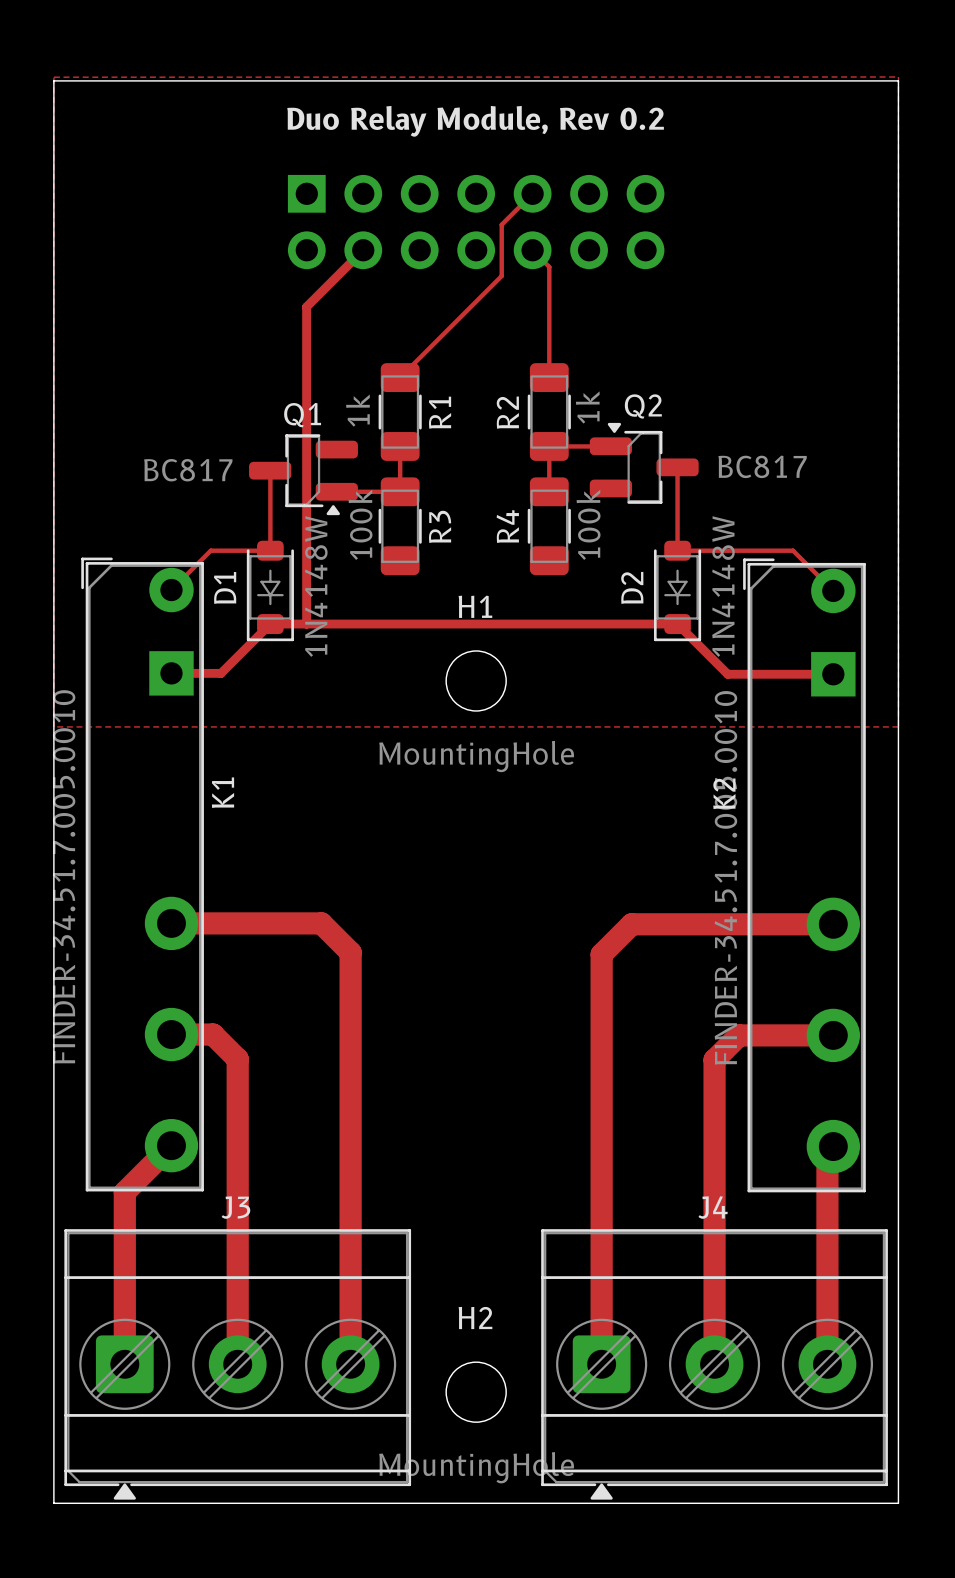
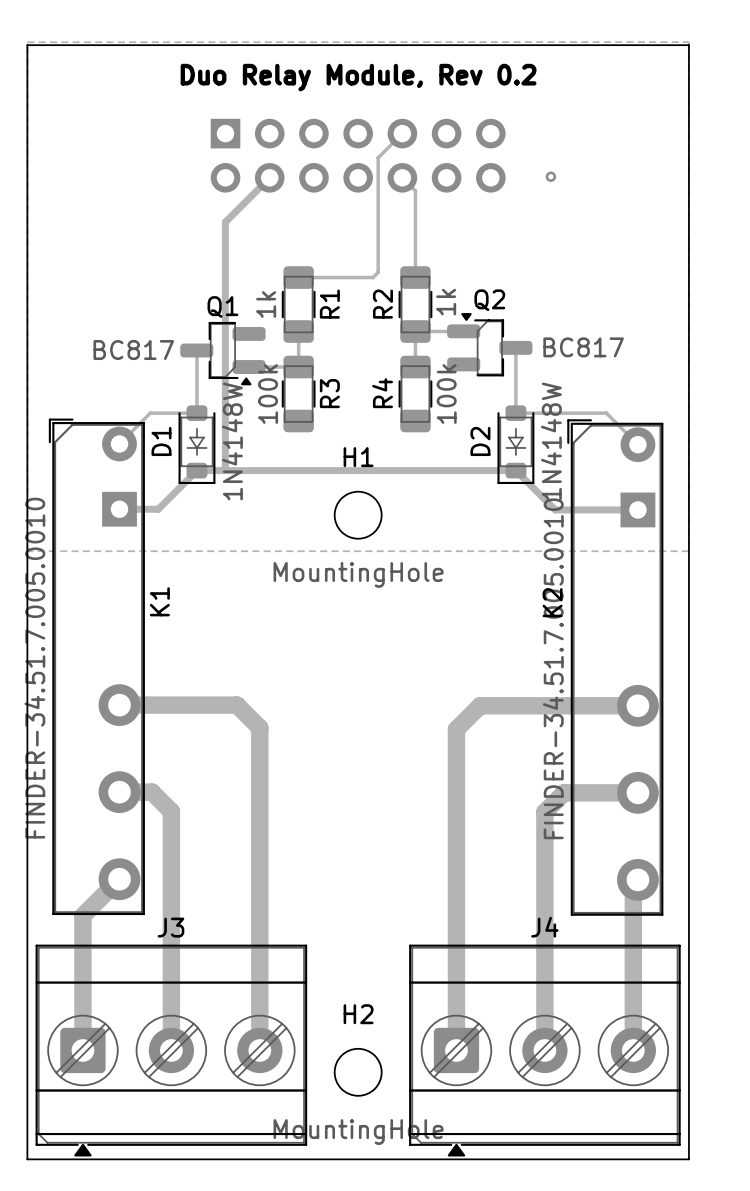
via: none -> (550, 176)
track: (501, 276) (400, 377) -> (378, 197) (378, 272) (372, 277) (298, 277)

